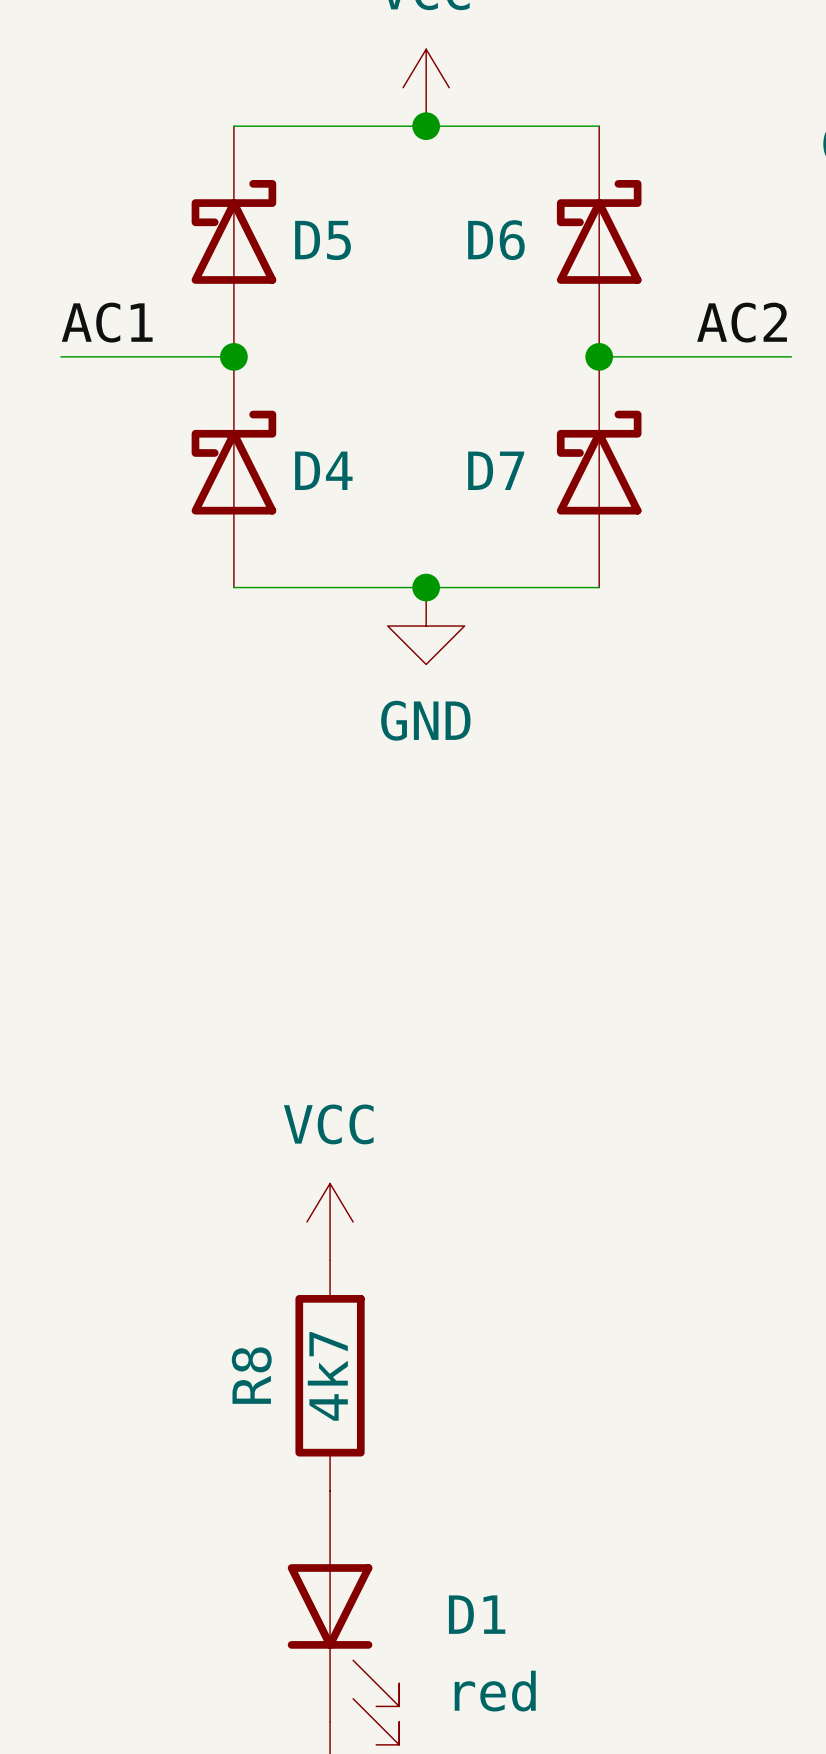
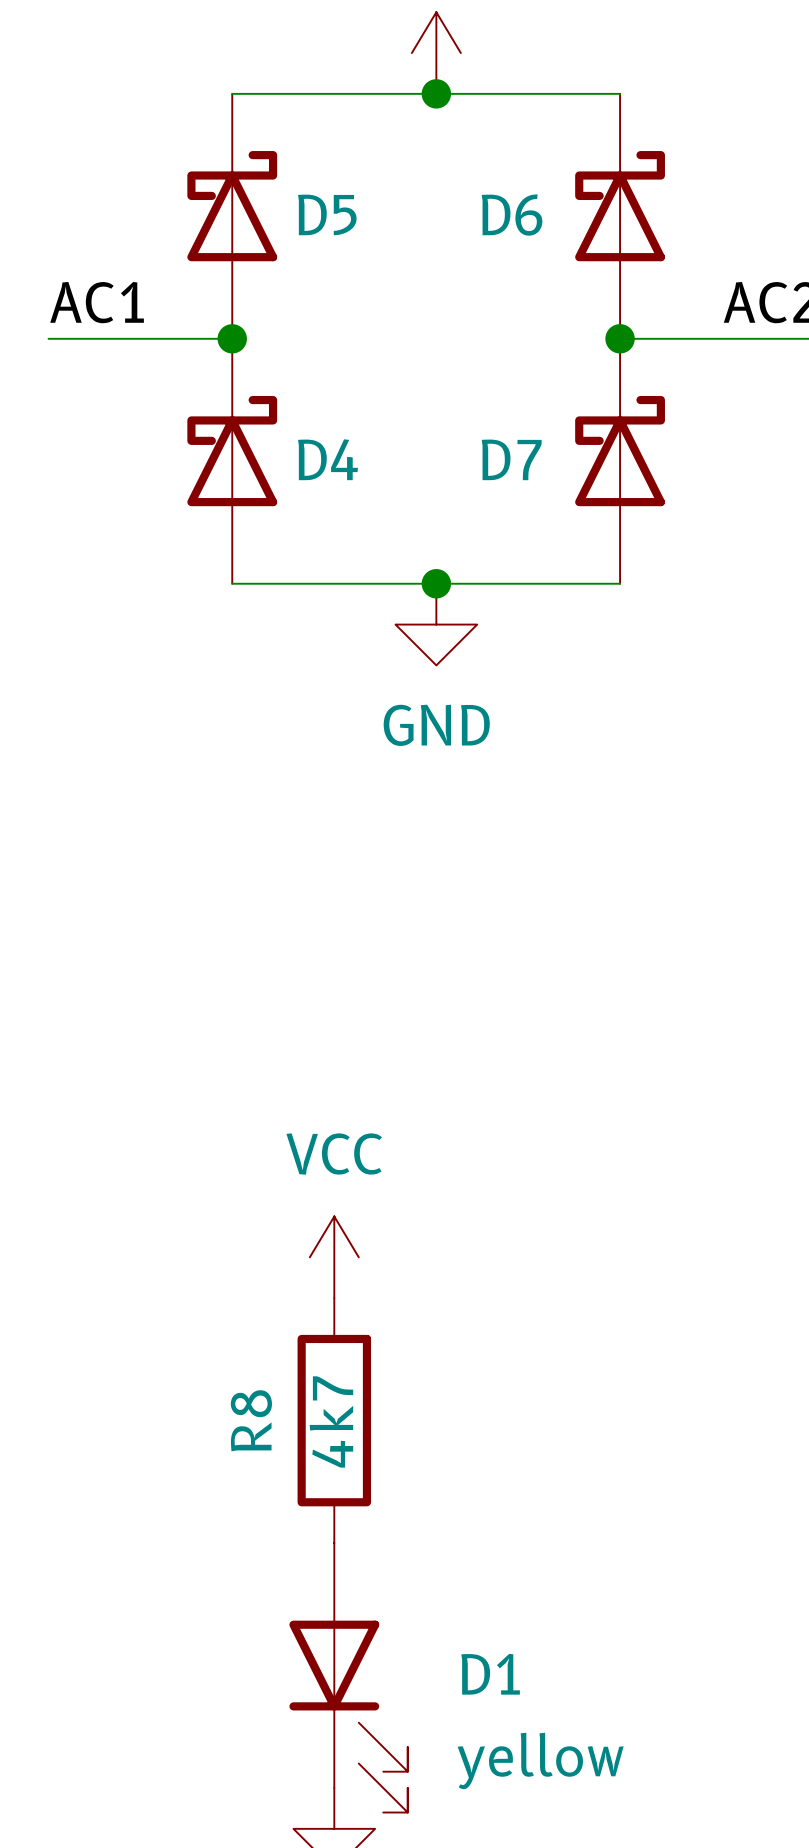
D1 value: red (495, 1691) -> yellow (540, 1760)

